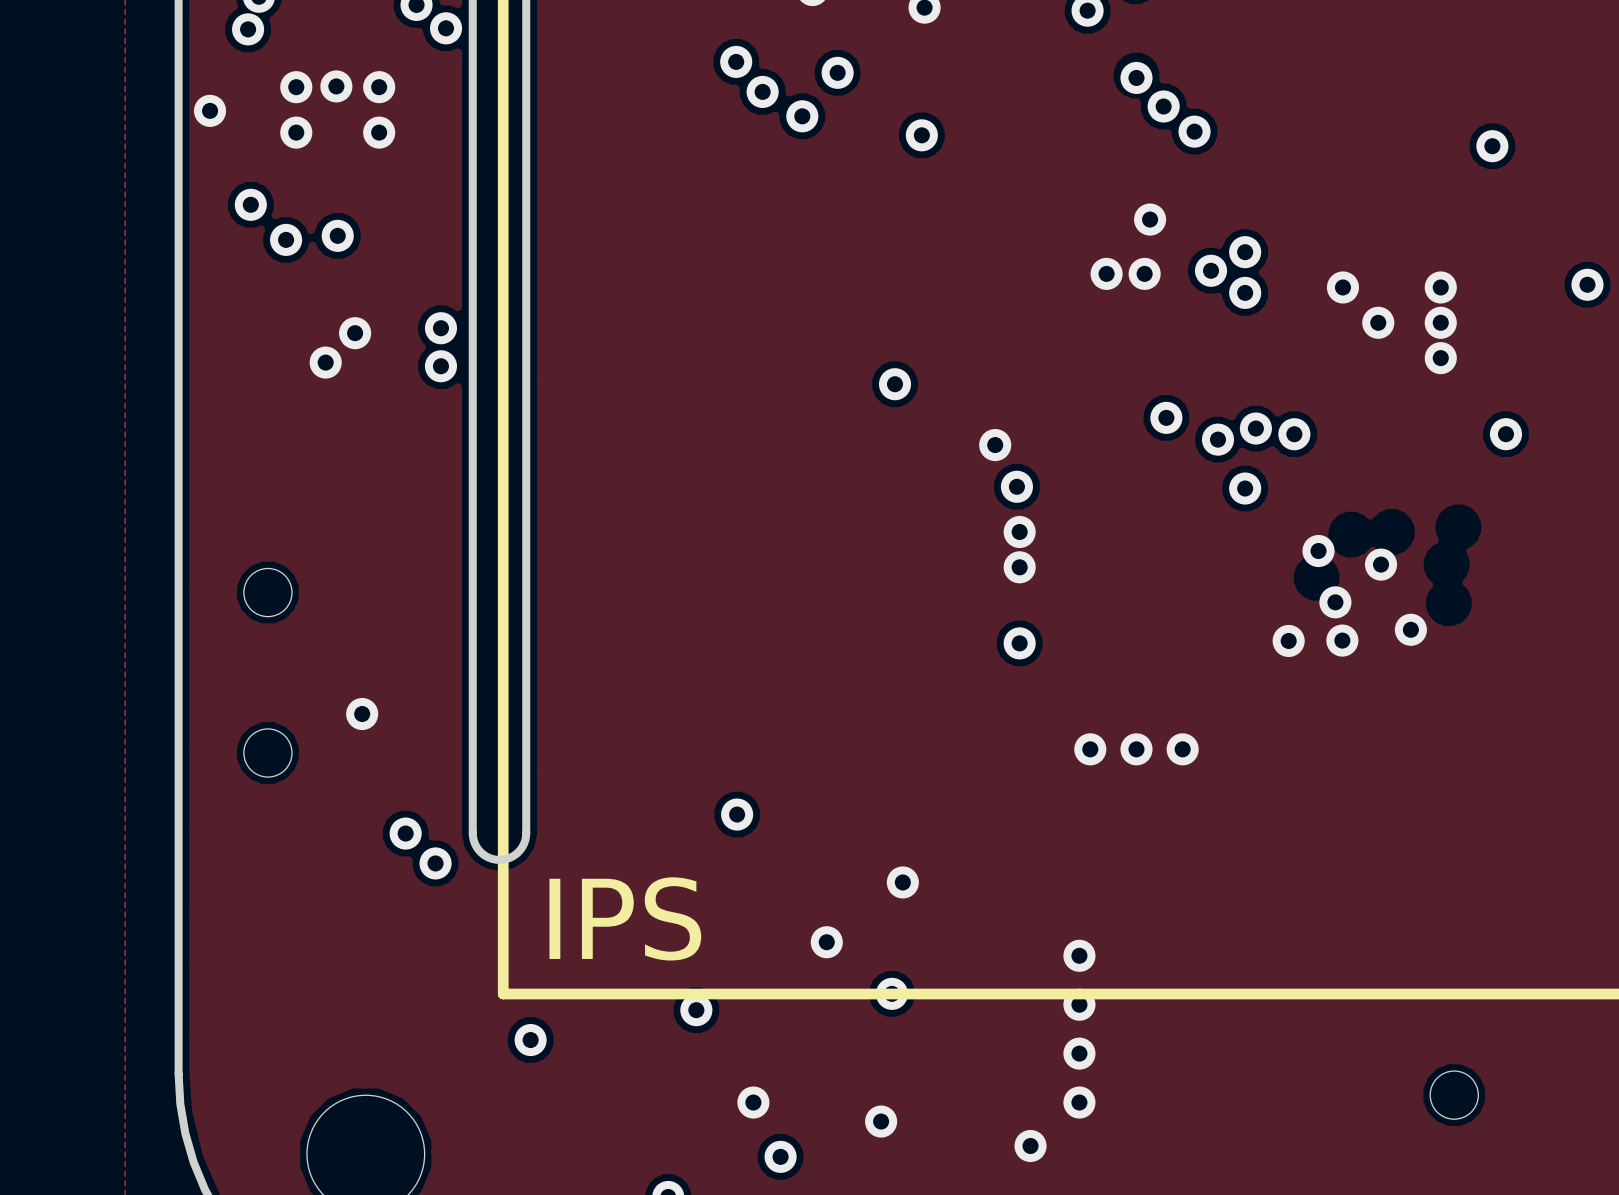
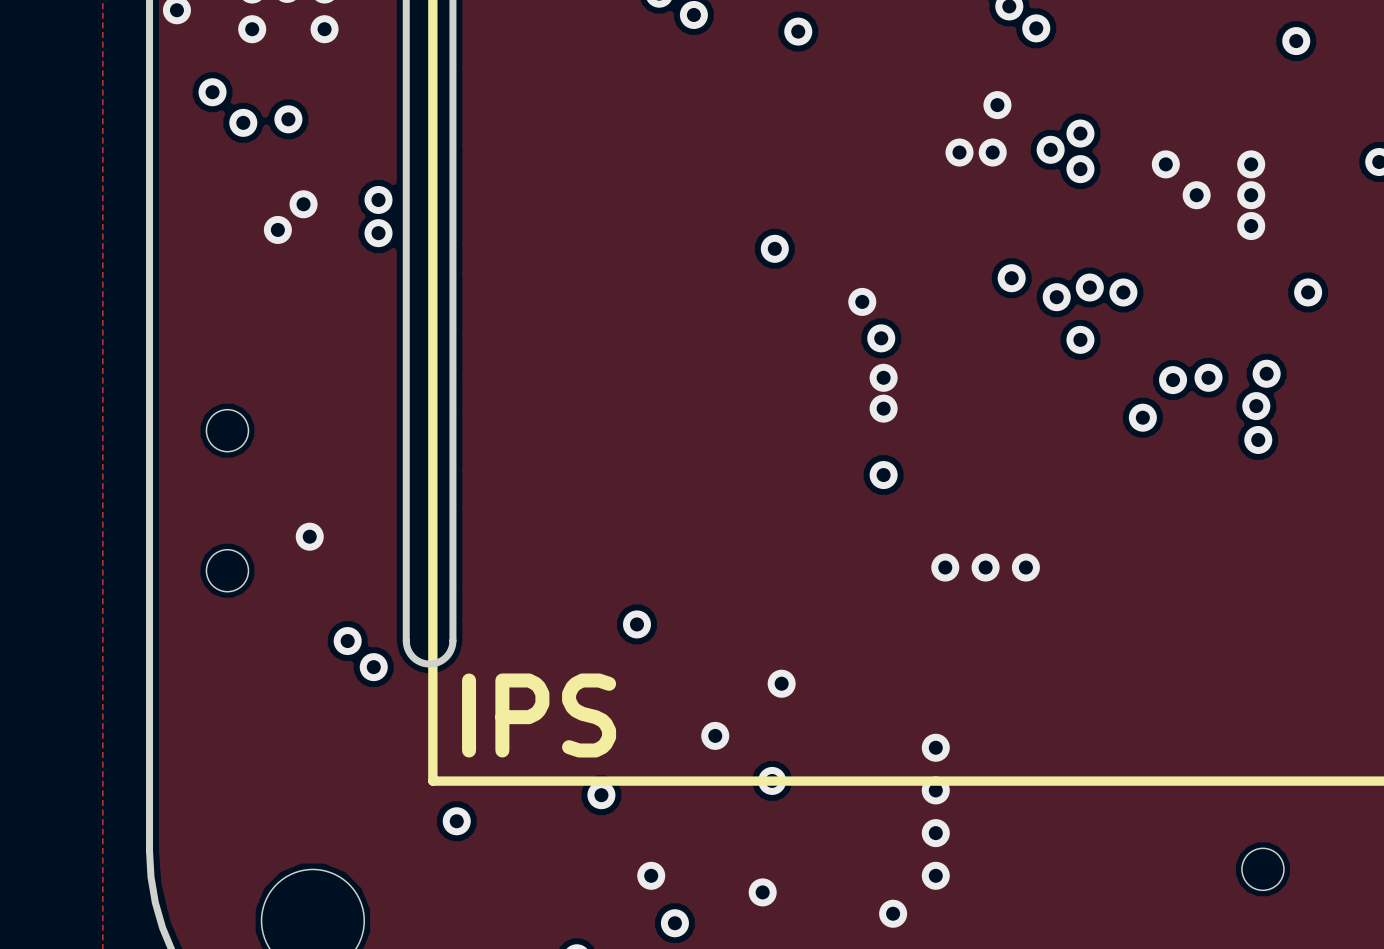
via: none -> (1266, 373)
via: none -> (1208, 377)
via: (1318, 551) -> none
via position: (1381, 564) -> (1173, 380)
via: none -> (1256, 406)
via: none -> (1142, 417)
via: (1335, 602) -> none
via: none -> (1258, 439)
via: (1410, 629) -> none
via: (1288, 640) -> none
via: (1342, 640) -> none

